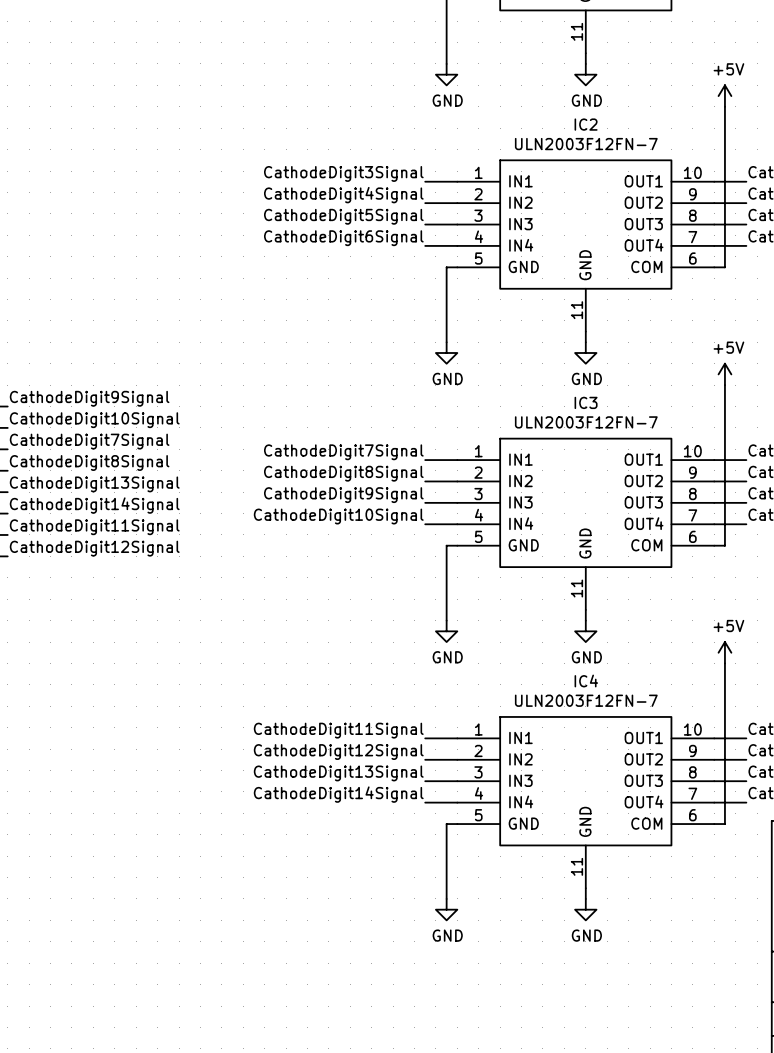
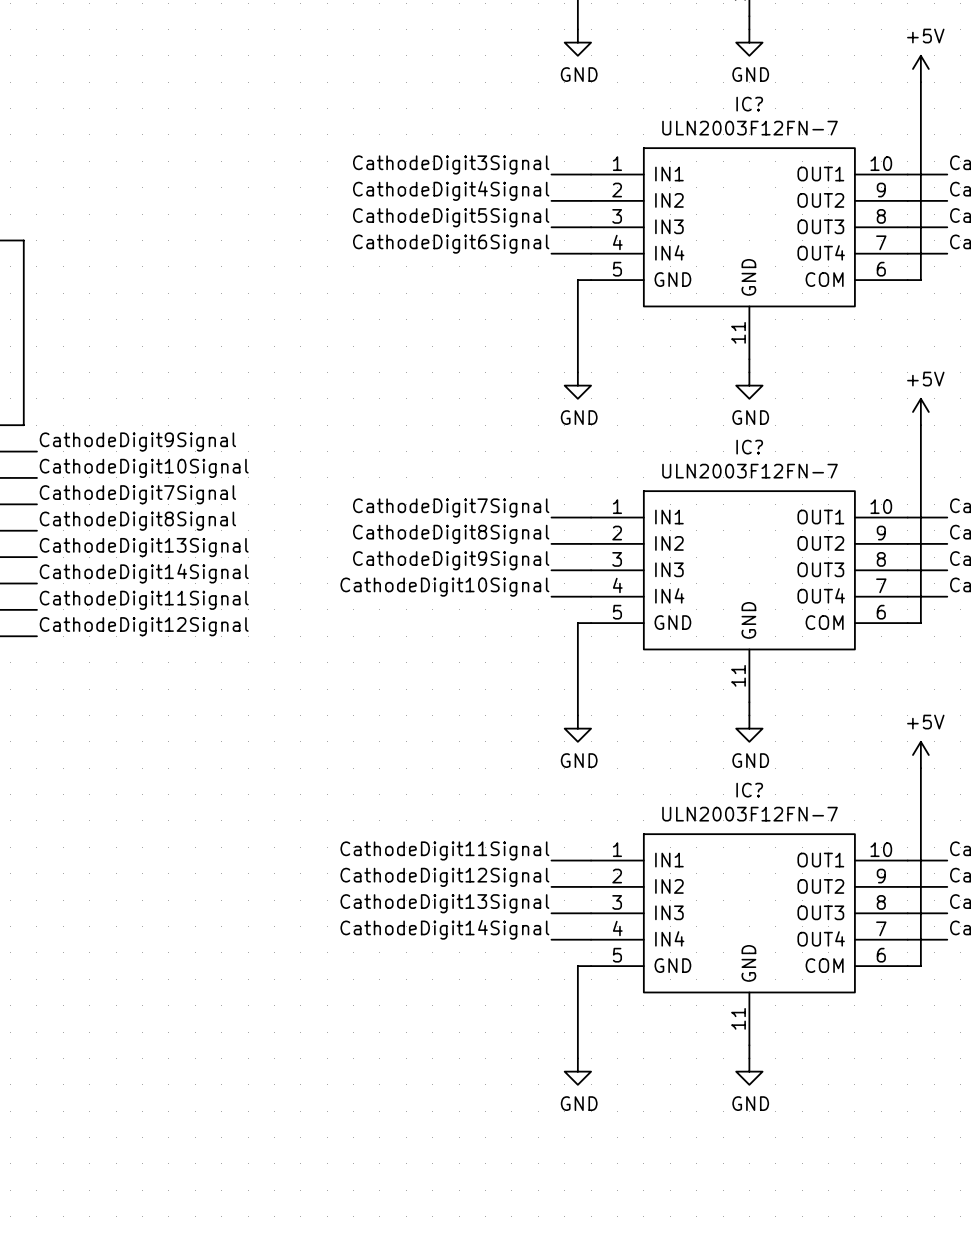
IC2 name: IC2 (586, 124) -> IC? (749, 104)
IC3 name: IC3 (586, 402) -> IC? (749, 447)
IC4 name: IC4 (586, 680) -> IC? (749, 790)

